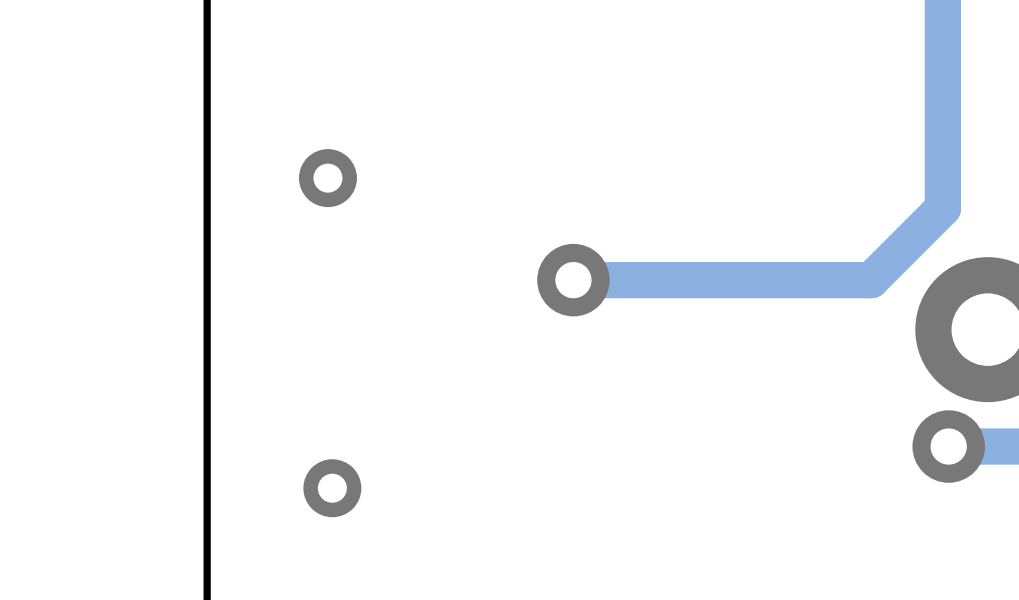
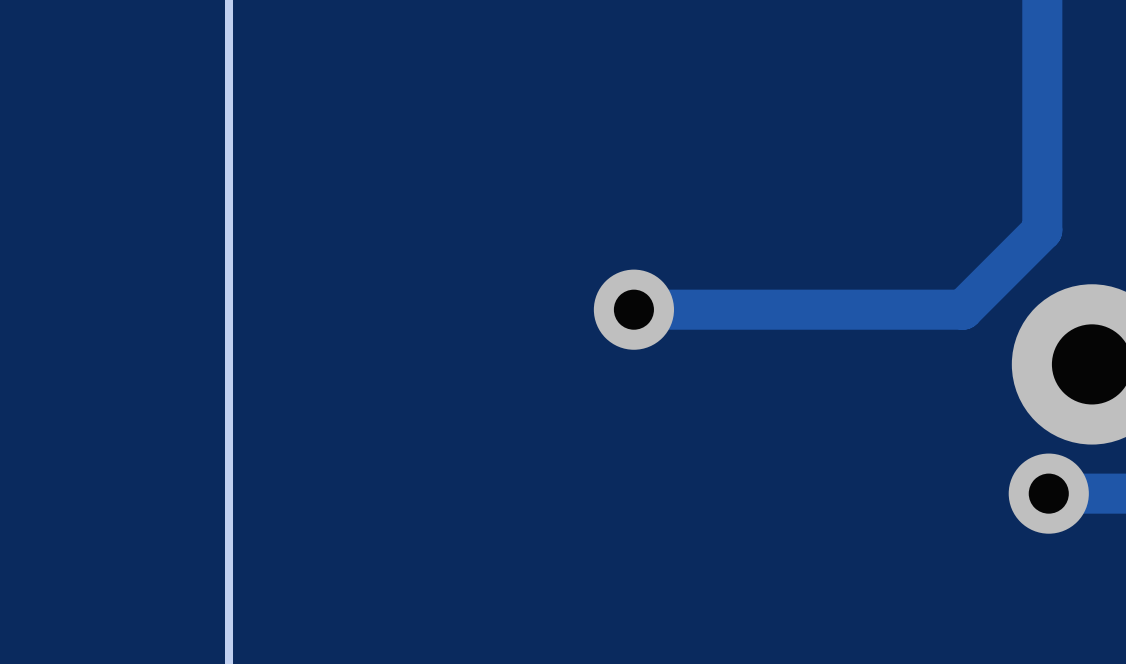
via: (327, 178) -> none
via: (332, 488) -> none

